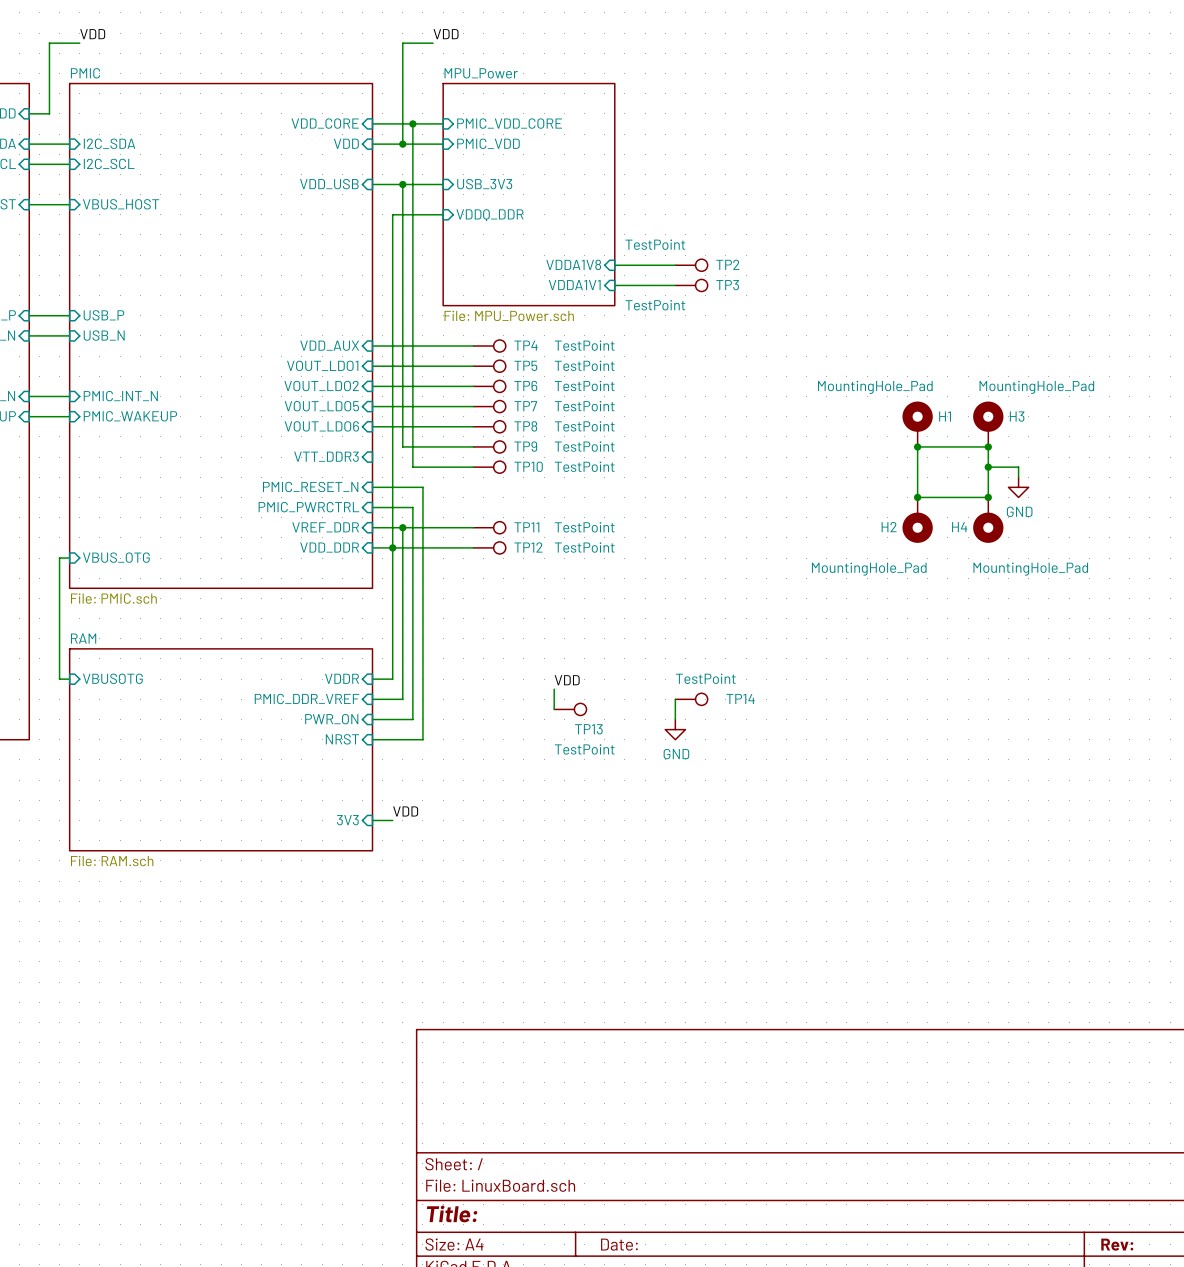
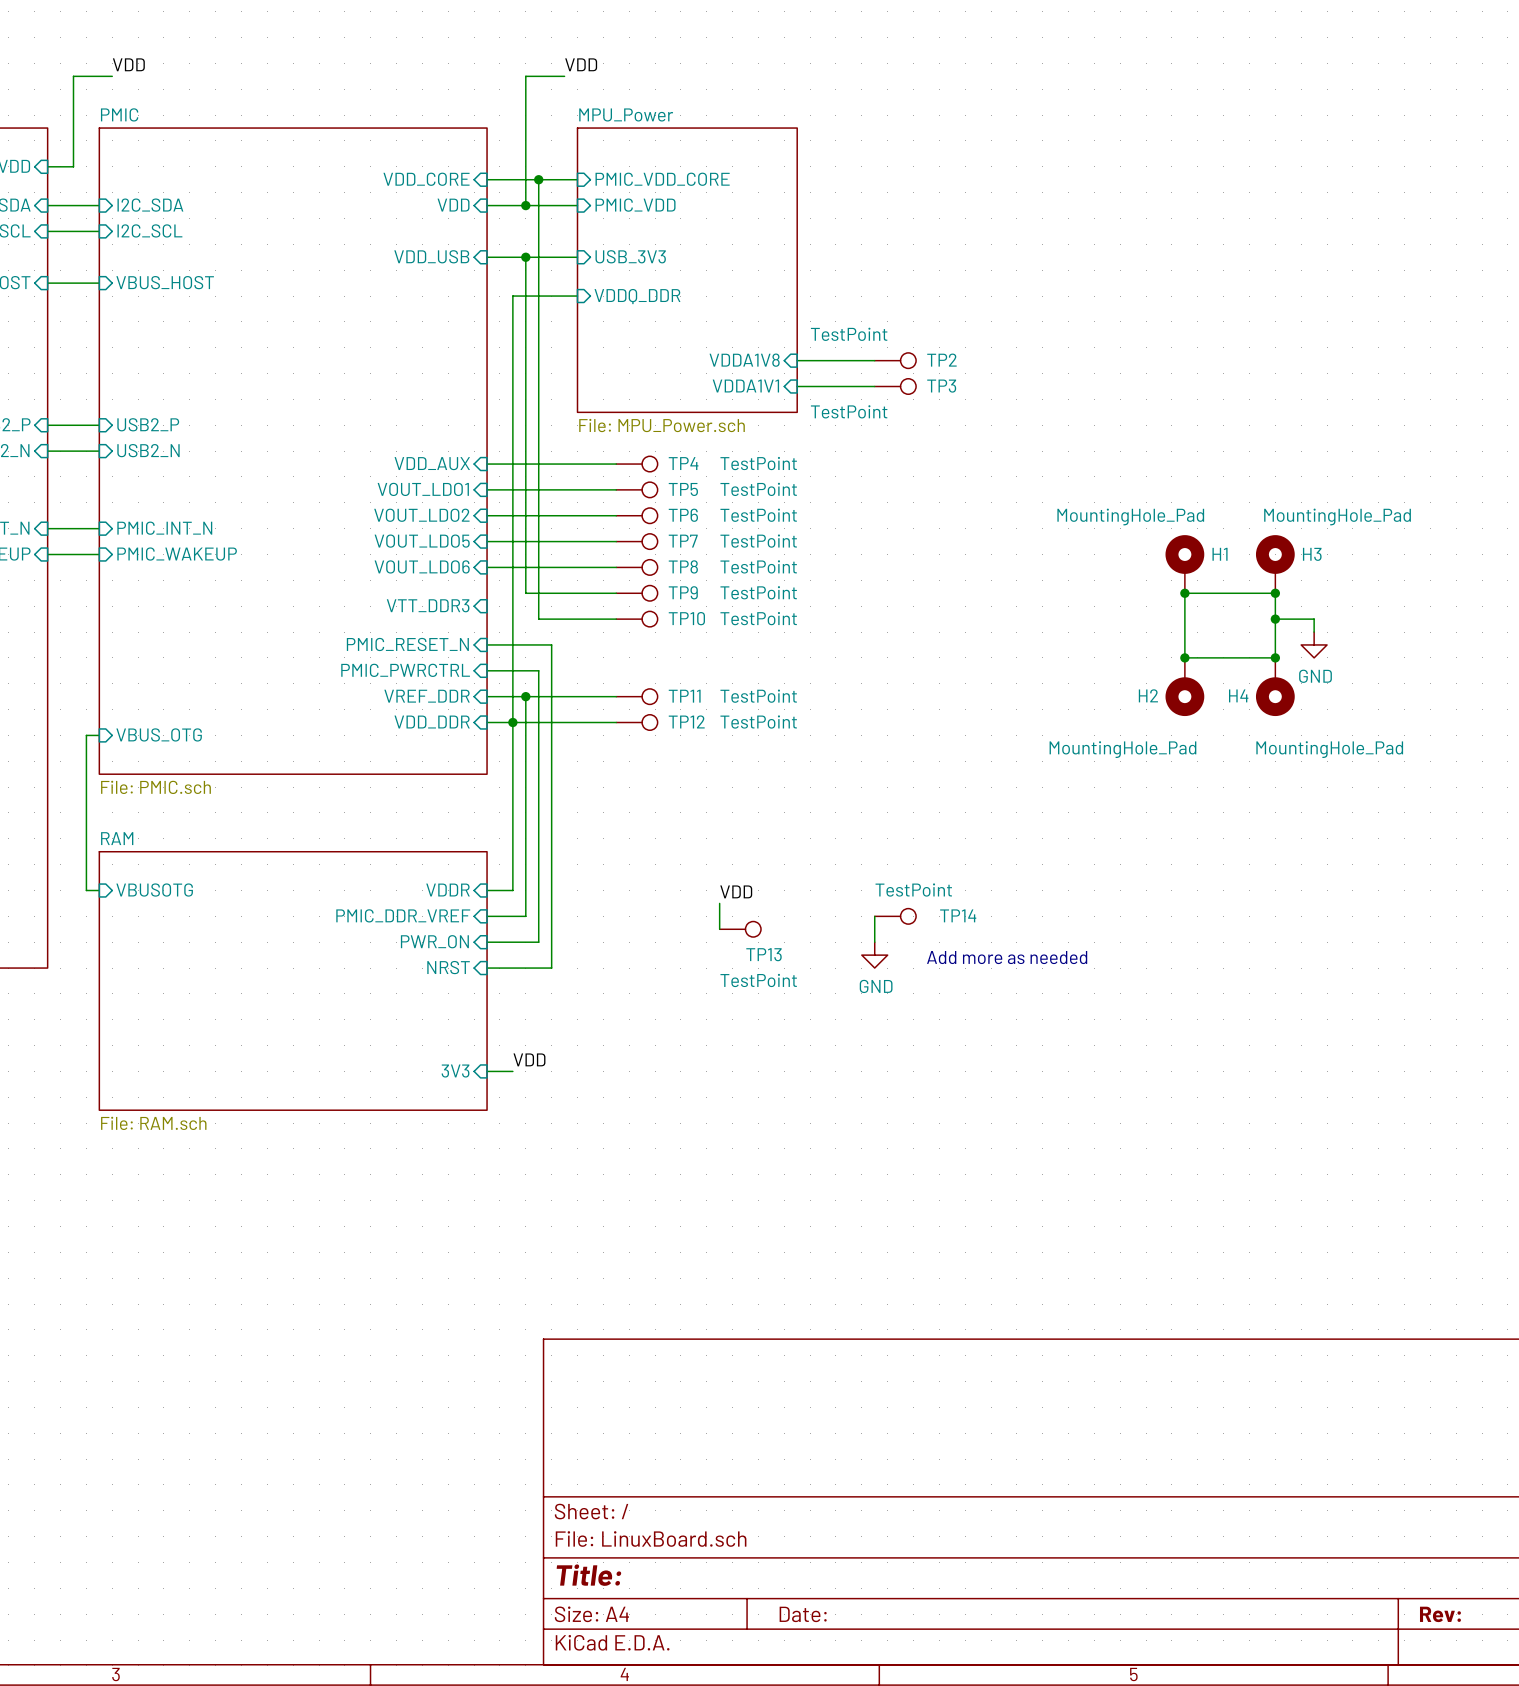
sheet pin: USB_P (103, 315) -> USB2_P (148, 424)
sheet pin: USB_N (104, 335) -> USB2_N (148, 450)
text: none -> Add more as needed (1007, 957)

